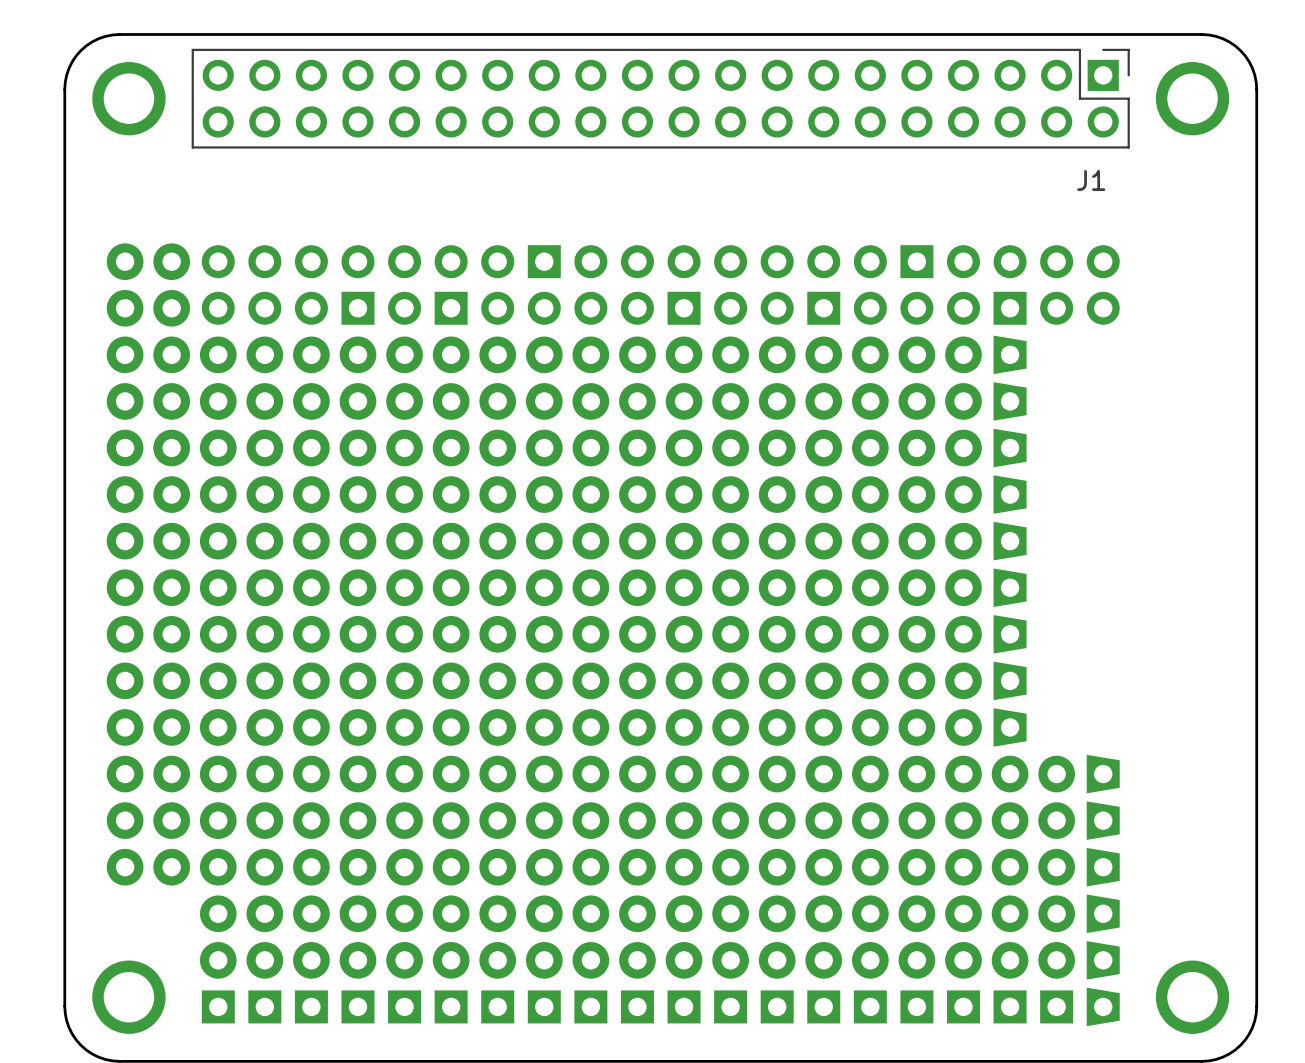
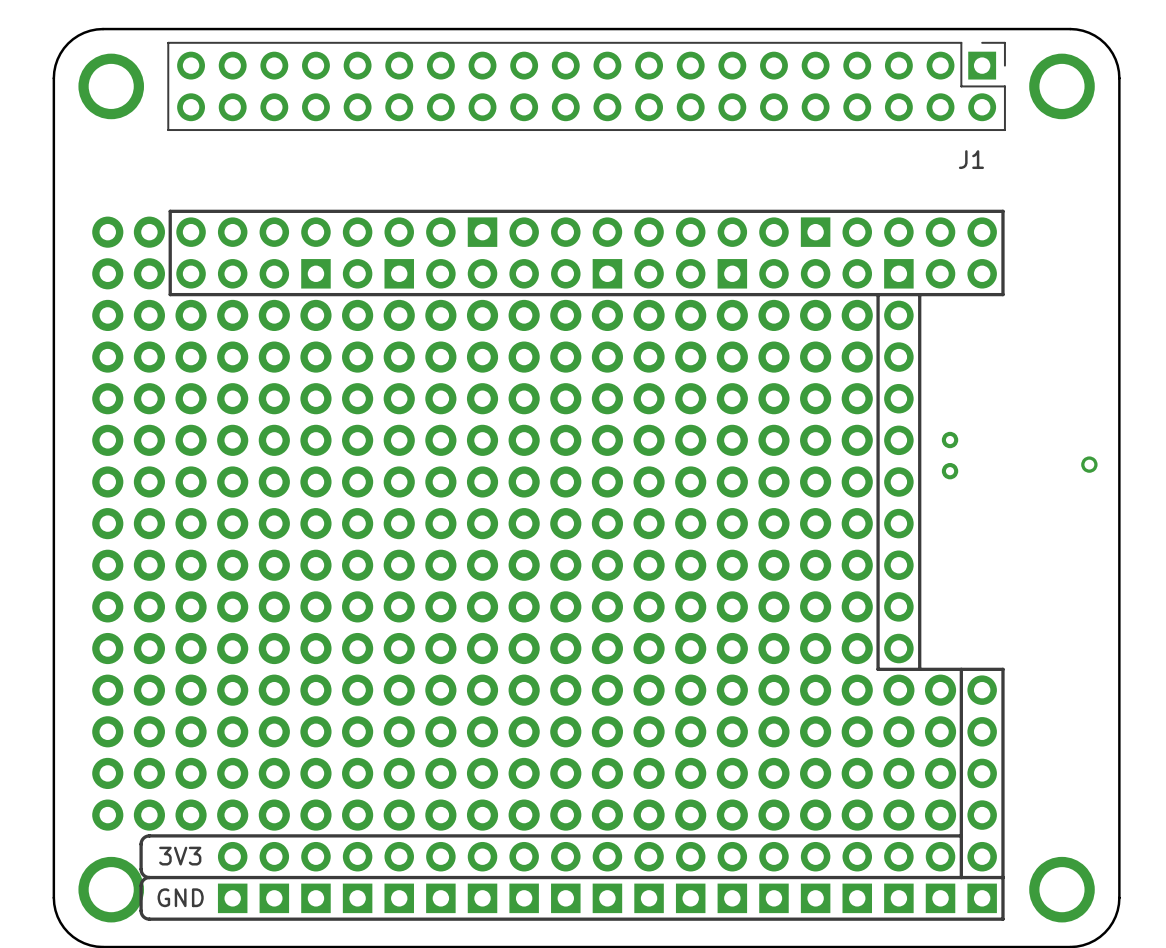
part footprint: [106, 243, 1120, 1027] -> [92, 209, 1005, 921]
part: none -> (950, 455)
part: none -> (1089, 464)

